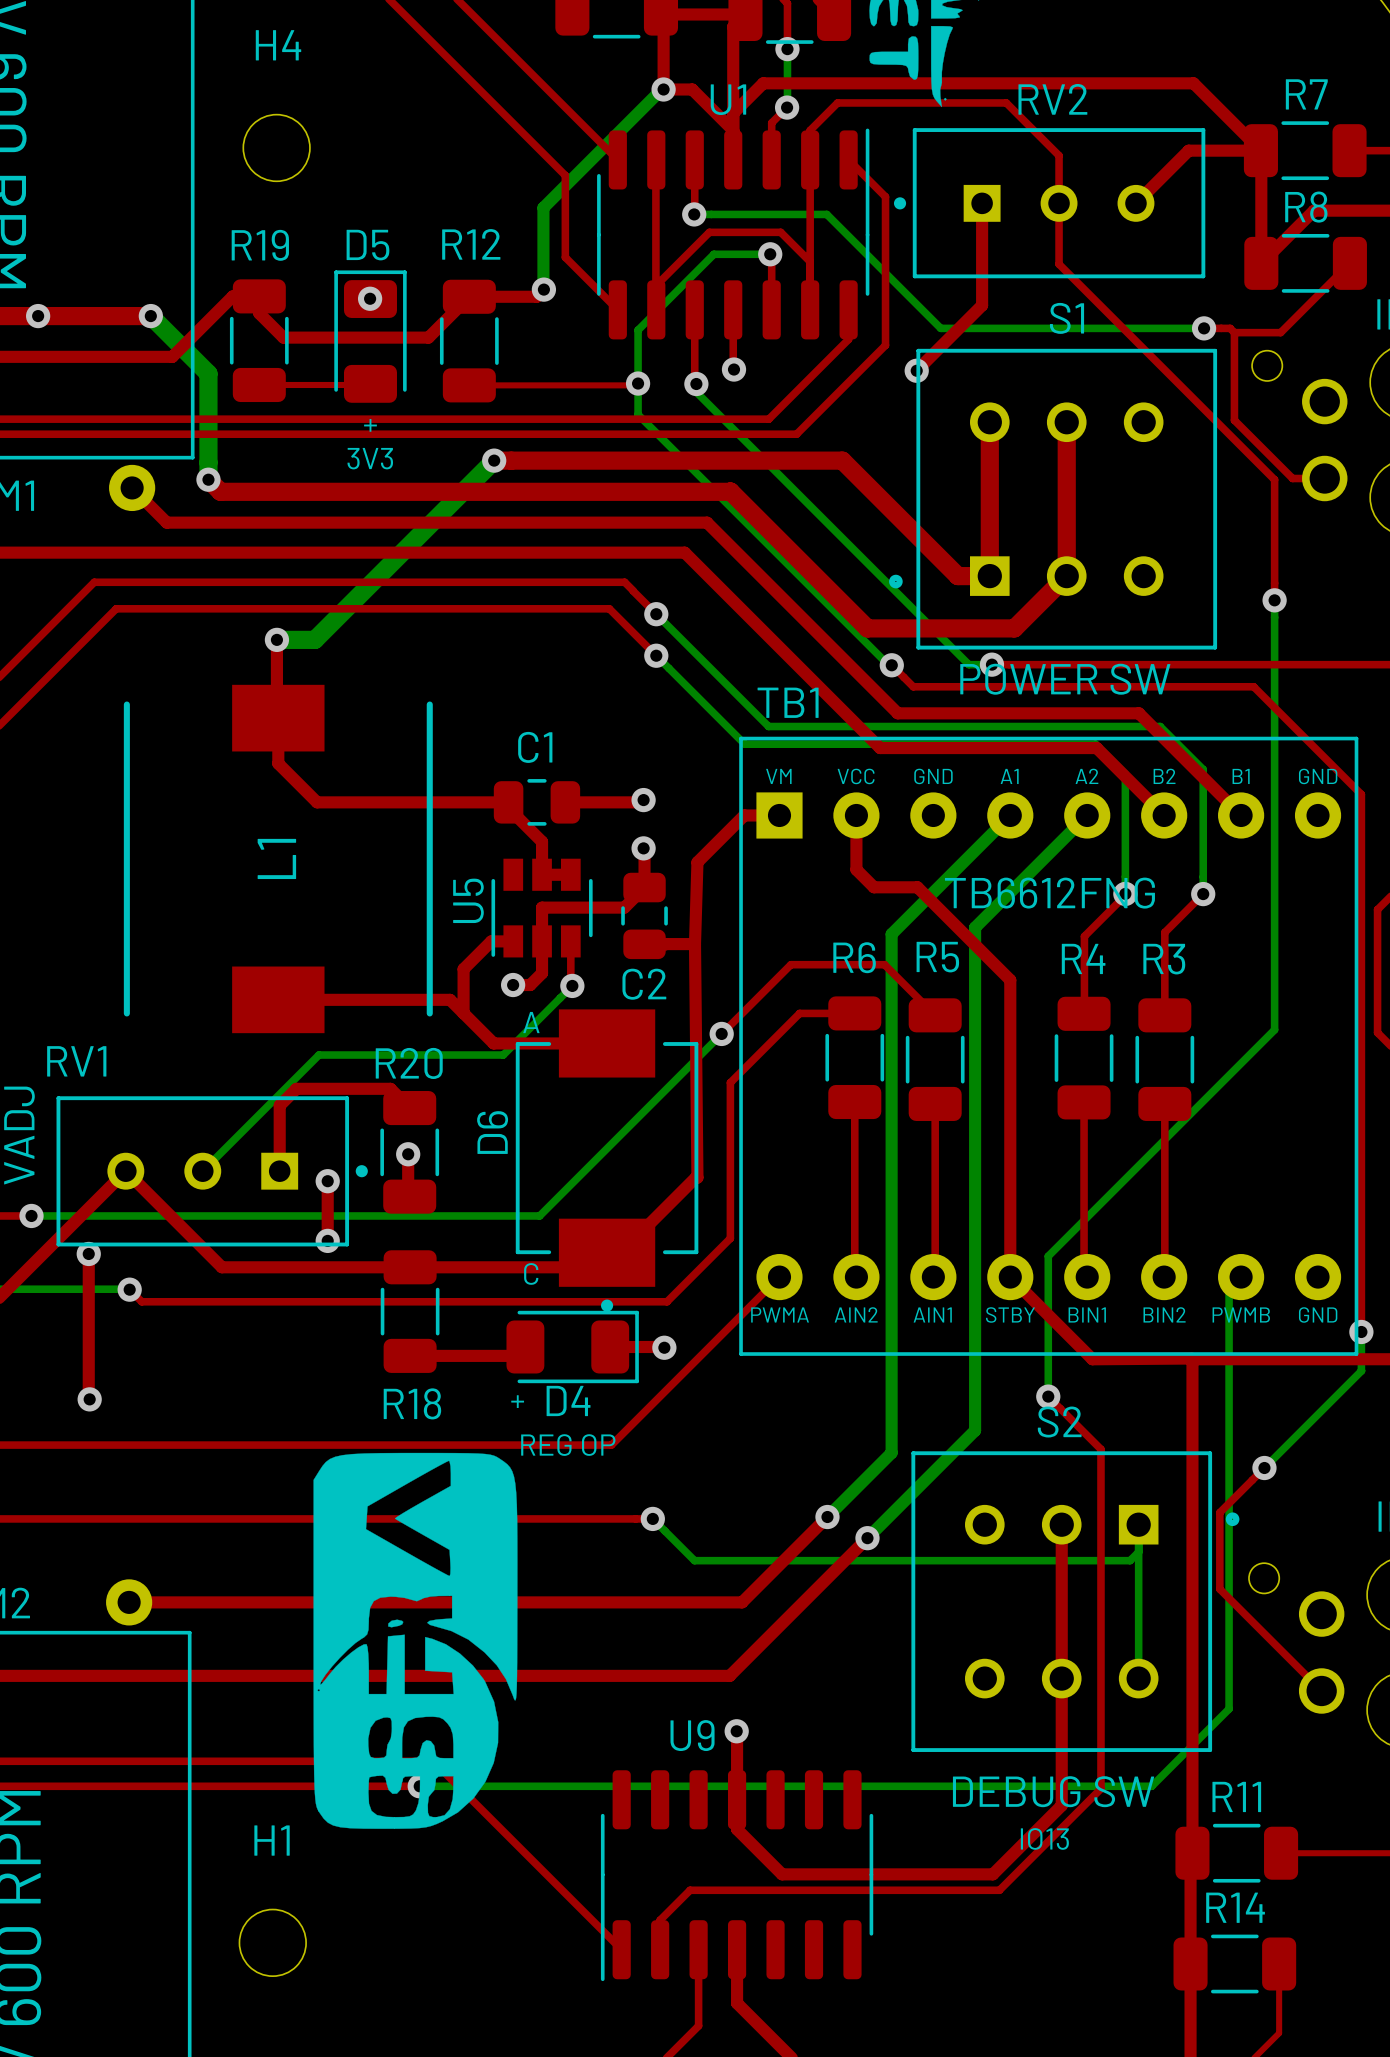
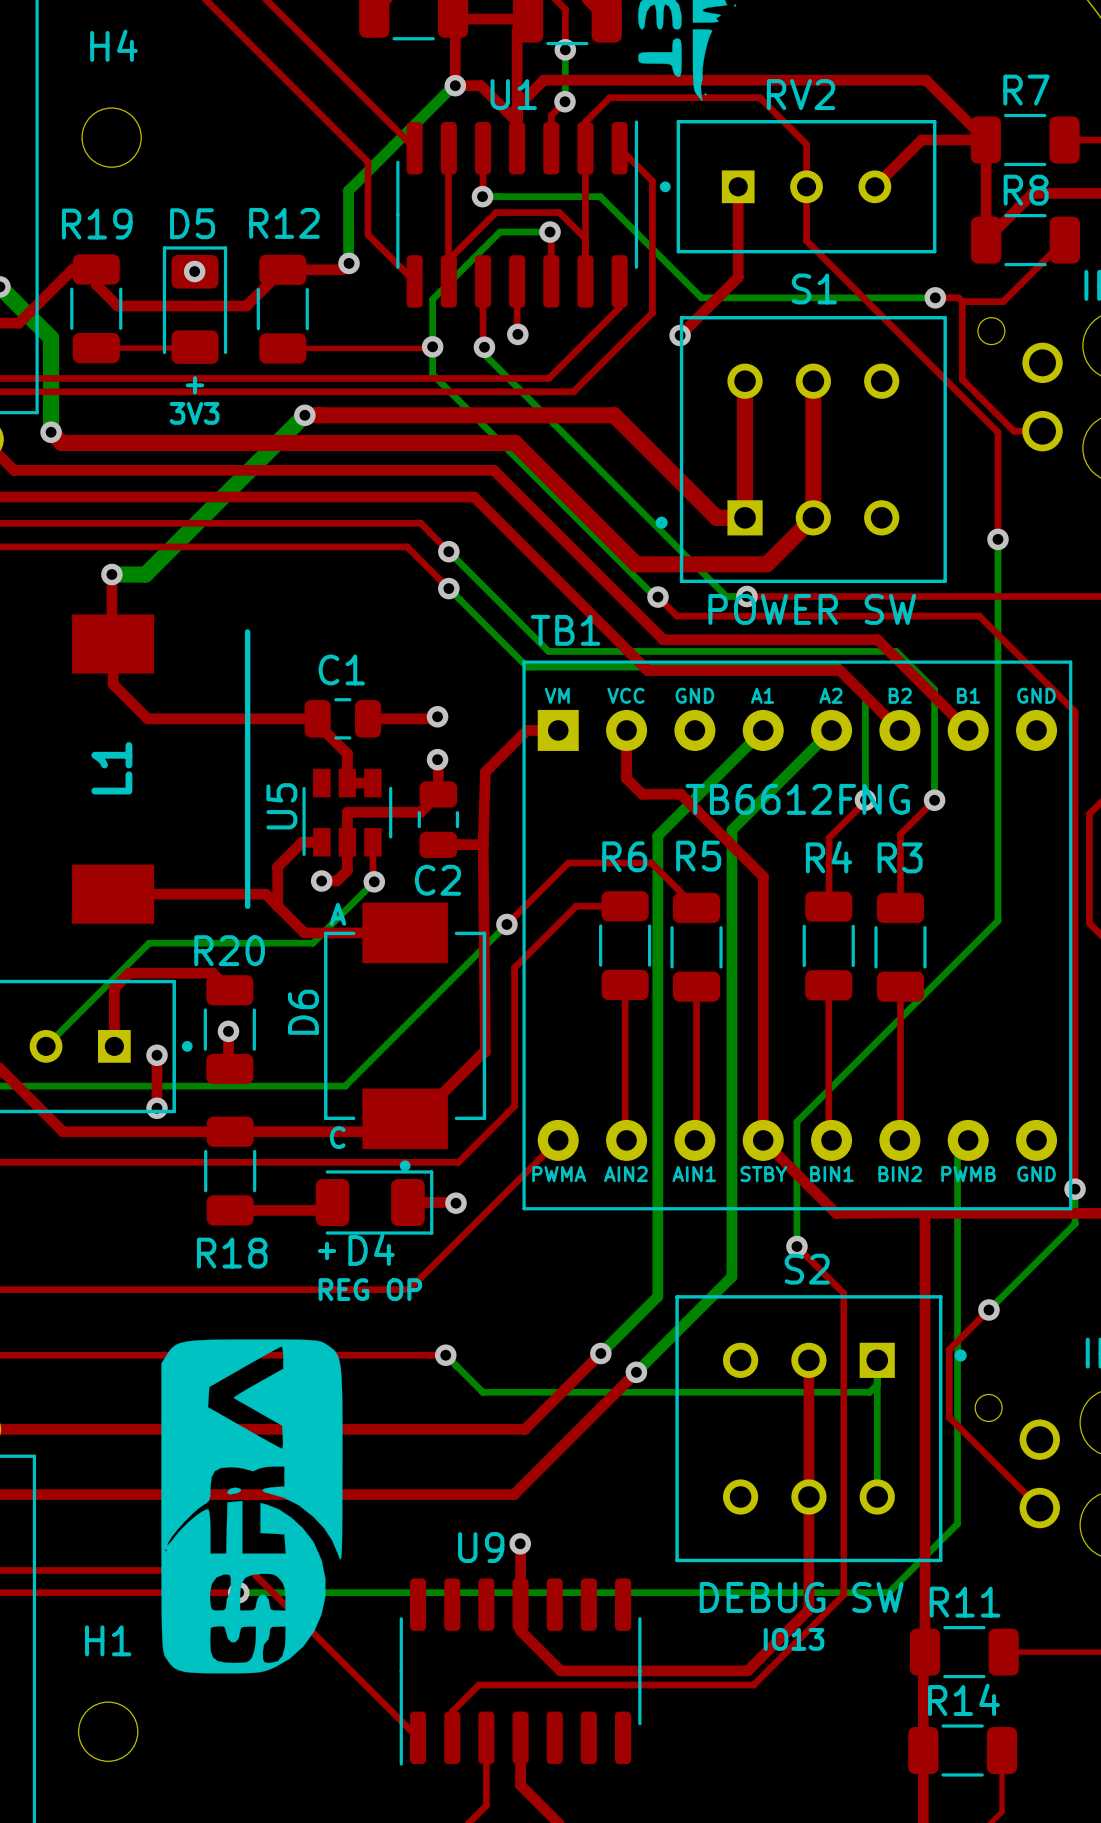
drawing position: (415, 1640) -> (251, 1506)

